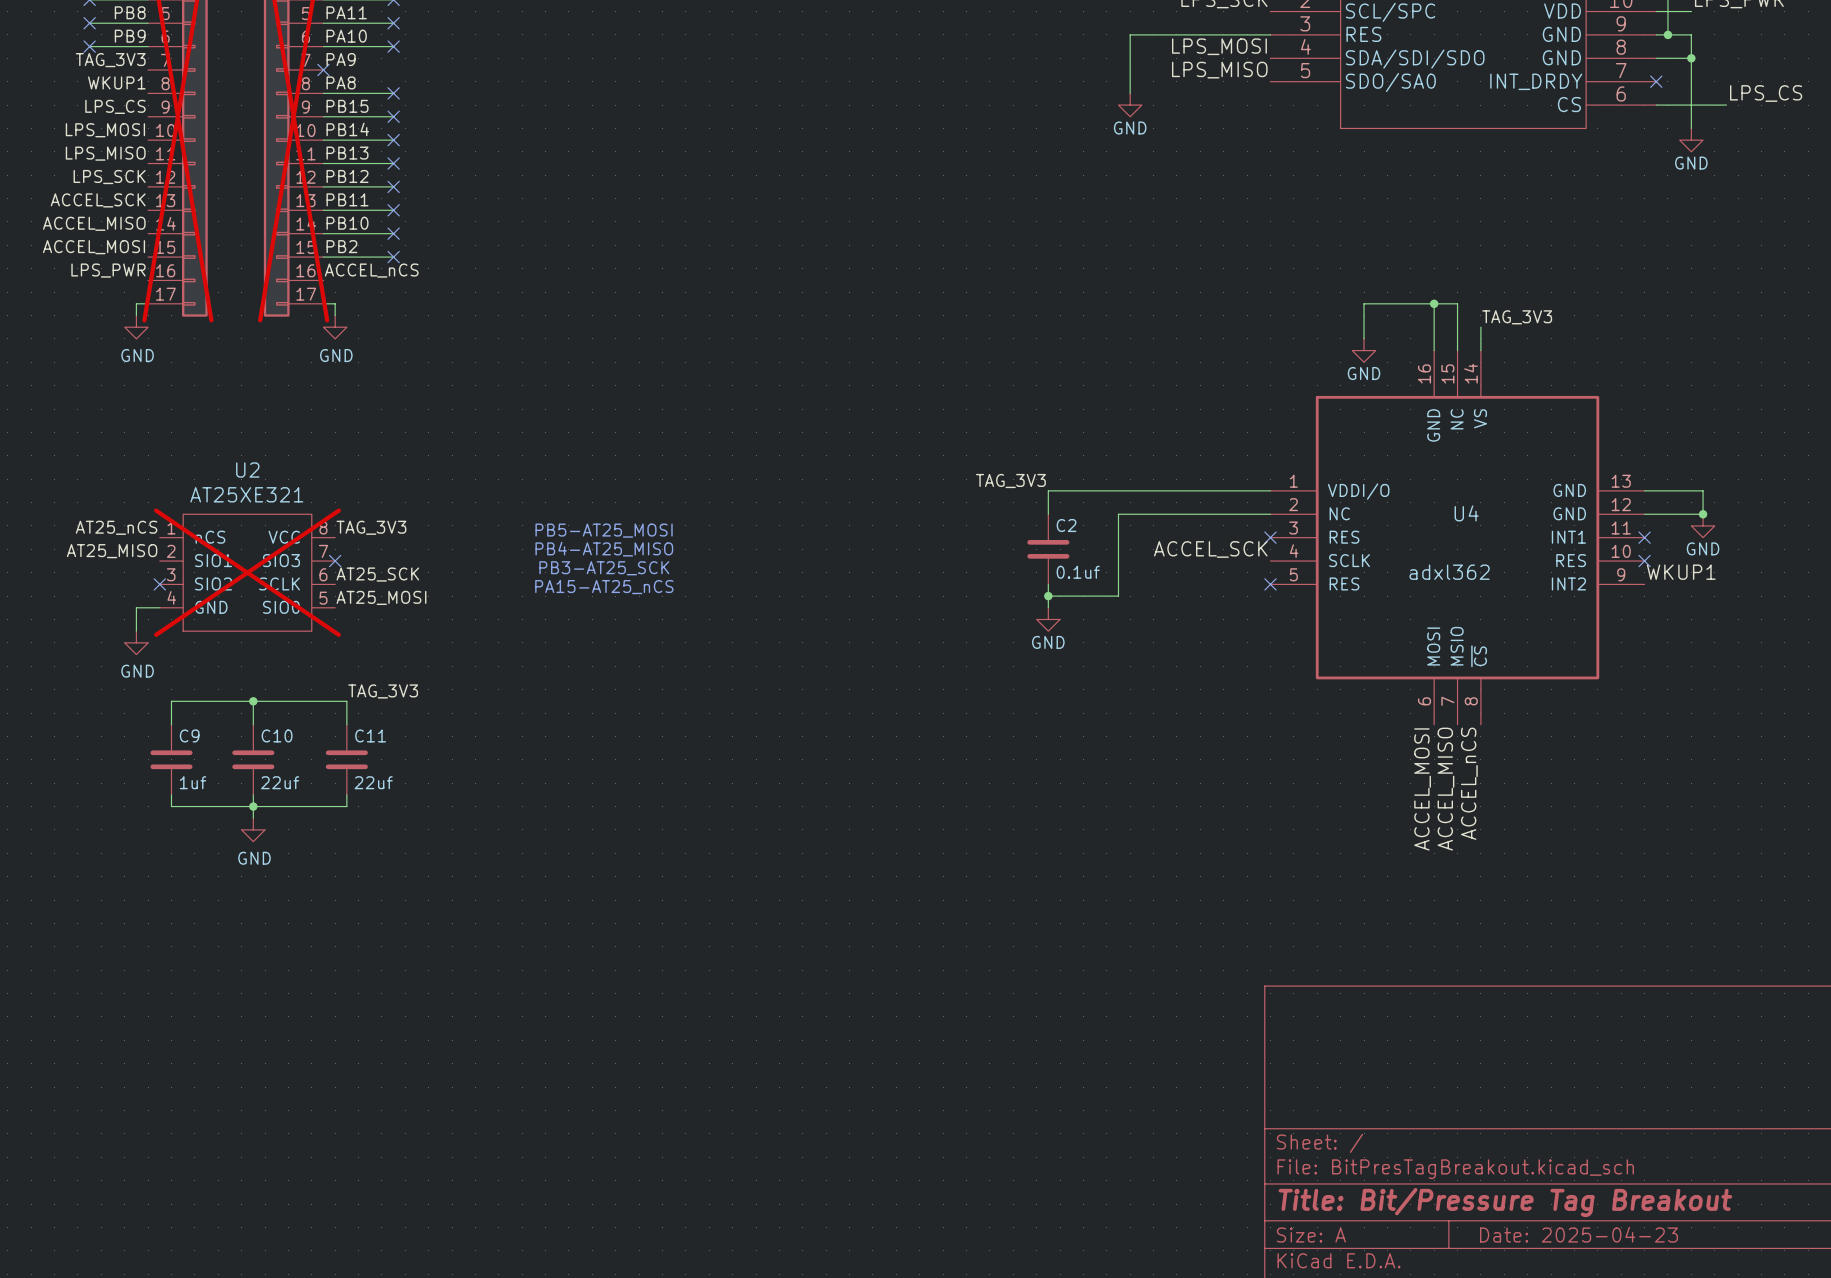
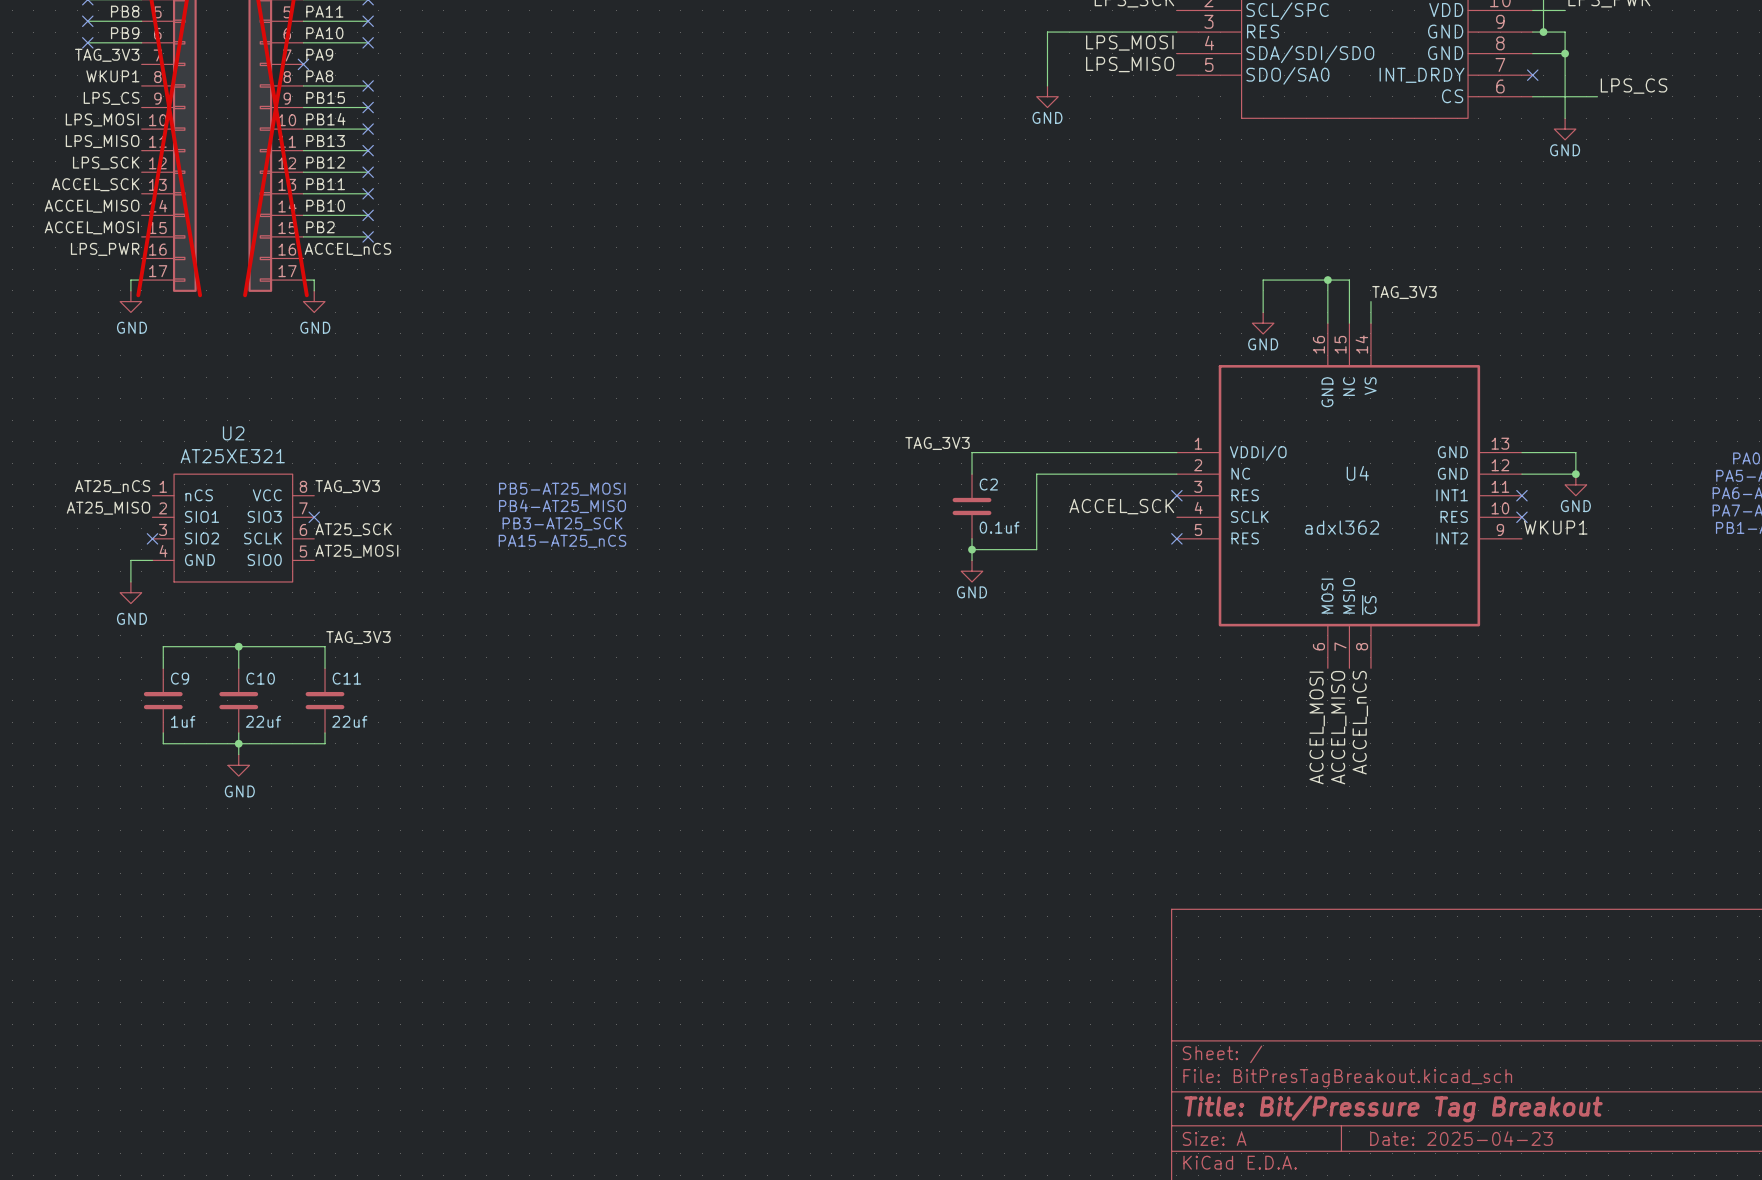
U2 do-not-place cross: (247, 572) -> none

